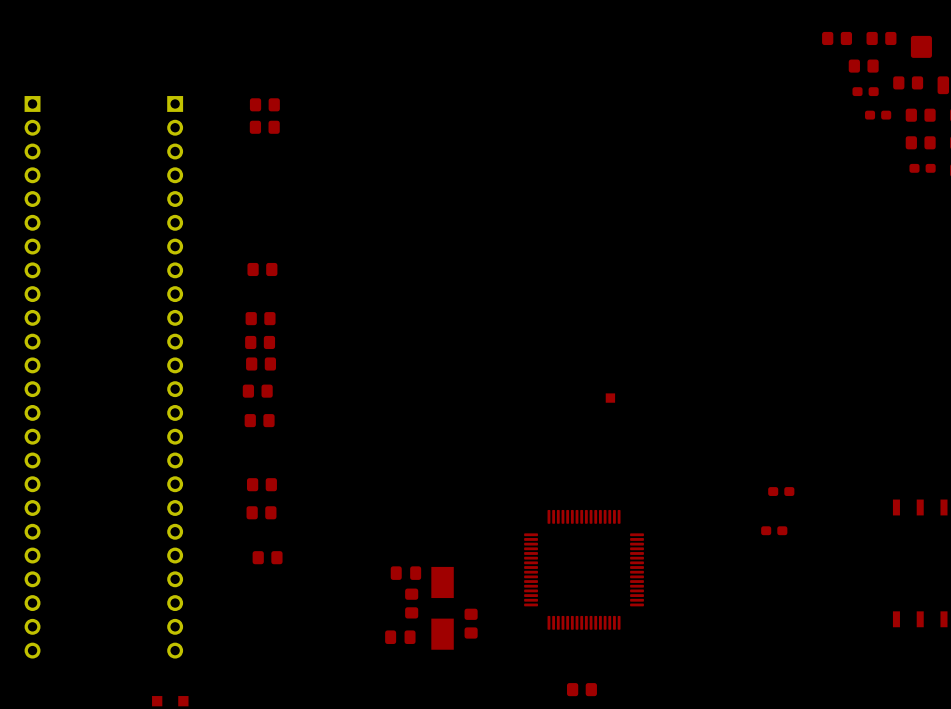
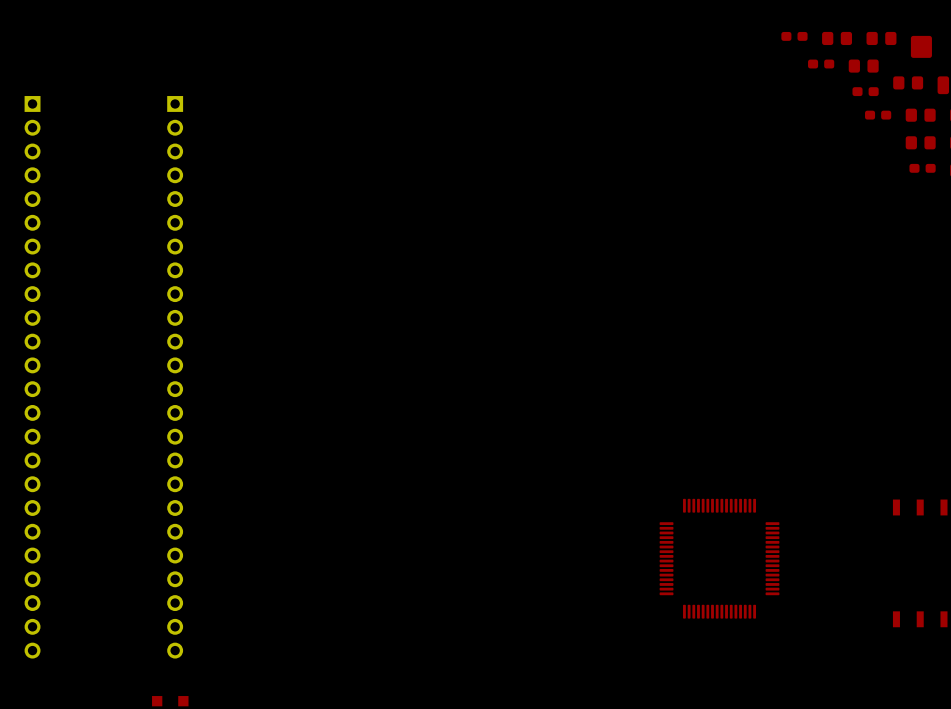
part: none -> (794, 36)
part: none -> (821, 64)
part: (264, 104) -> none
part: (264, 127) -> none
part: (262, 269) -> none
part: (260, 318) -> none
part: (260, 342) -> none
part: (261, 364) -> none
part: (257, 391) -> none
part: (610, 398) -> none
part: (259, 420) -> none
part: (261, 484) -> none
part: (781, 491) -> none
part: (261, 512) -> none
part: (774, 530) -> none
part: (267, 557) -> none
part position: (584, 569) -> (719, 558)
part: (405, 573) -> none
part: (411, 603) -> none
part: (442, 608) -> none
part: (471, 623) -> none
part: (400, 637) -> none
part: (581, 689) -> none

